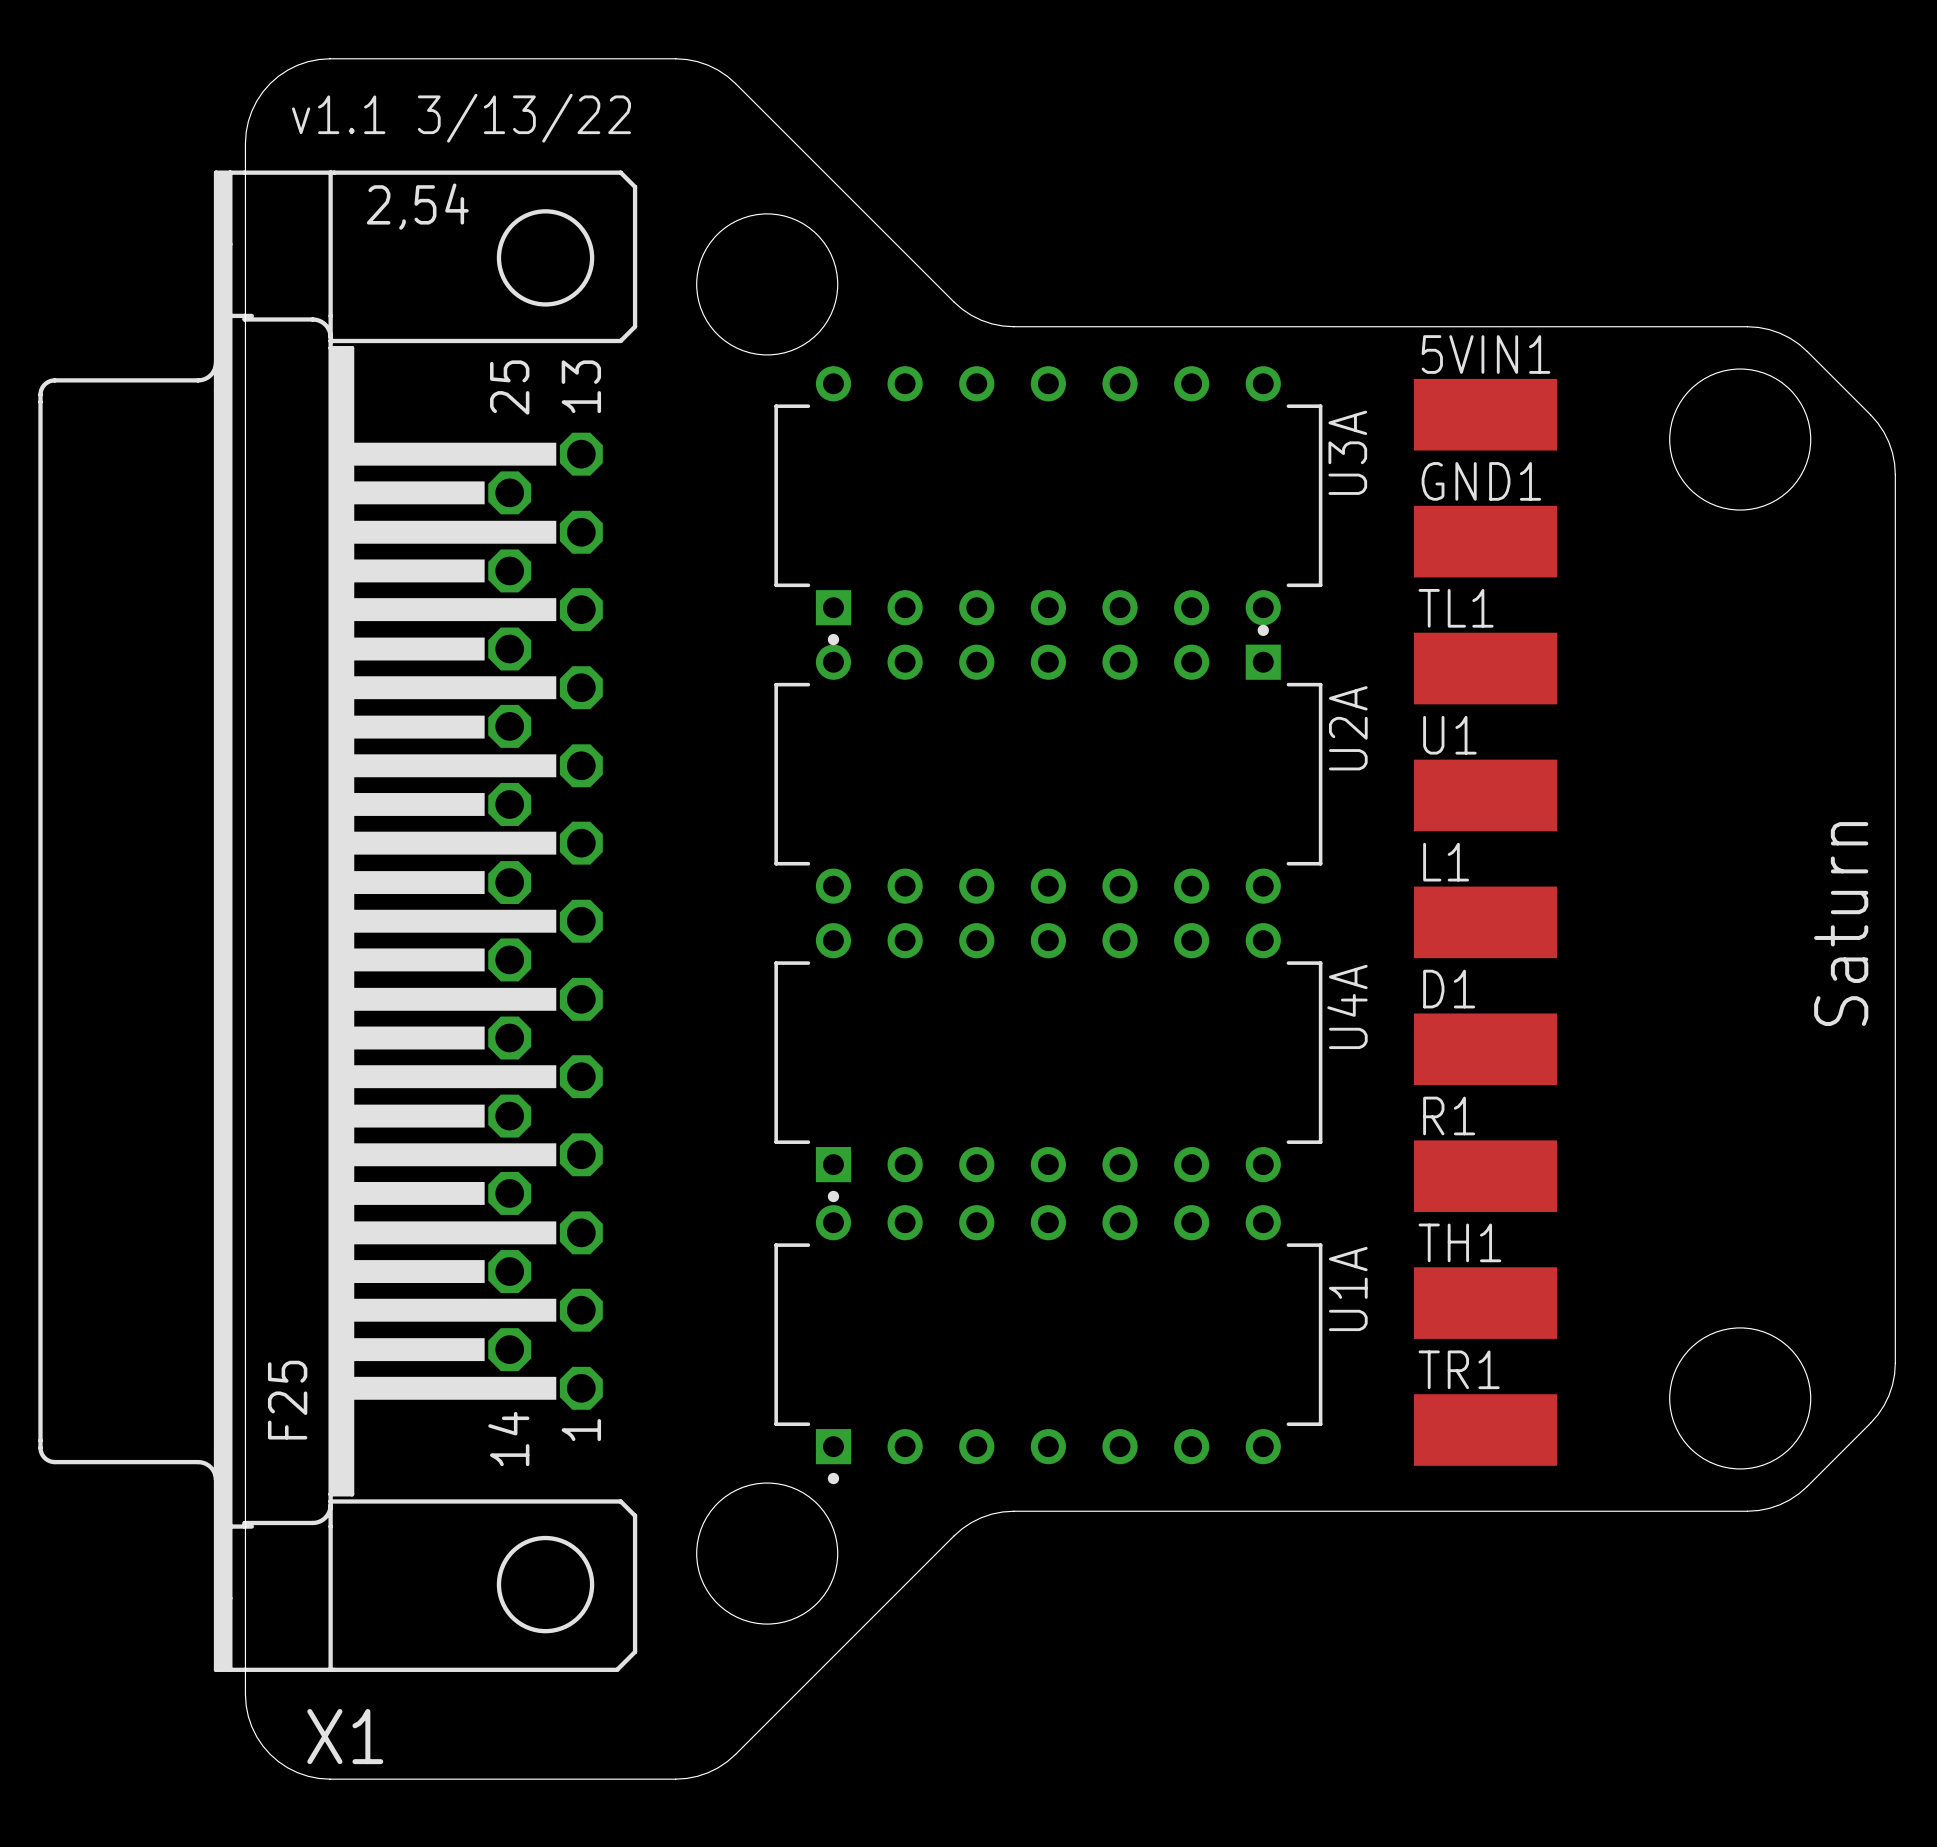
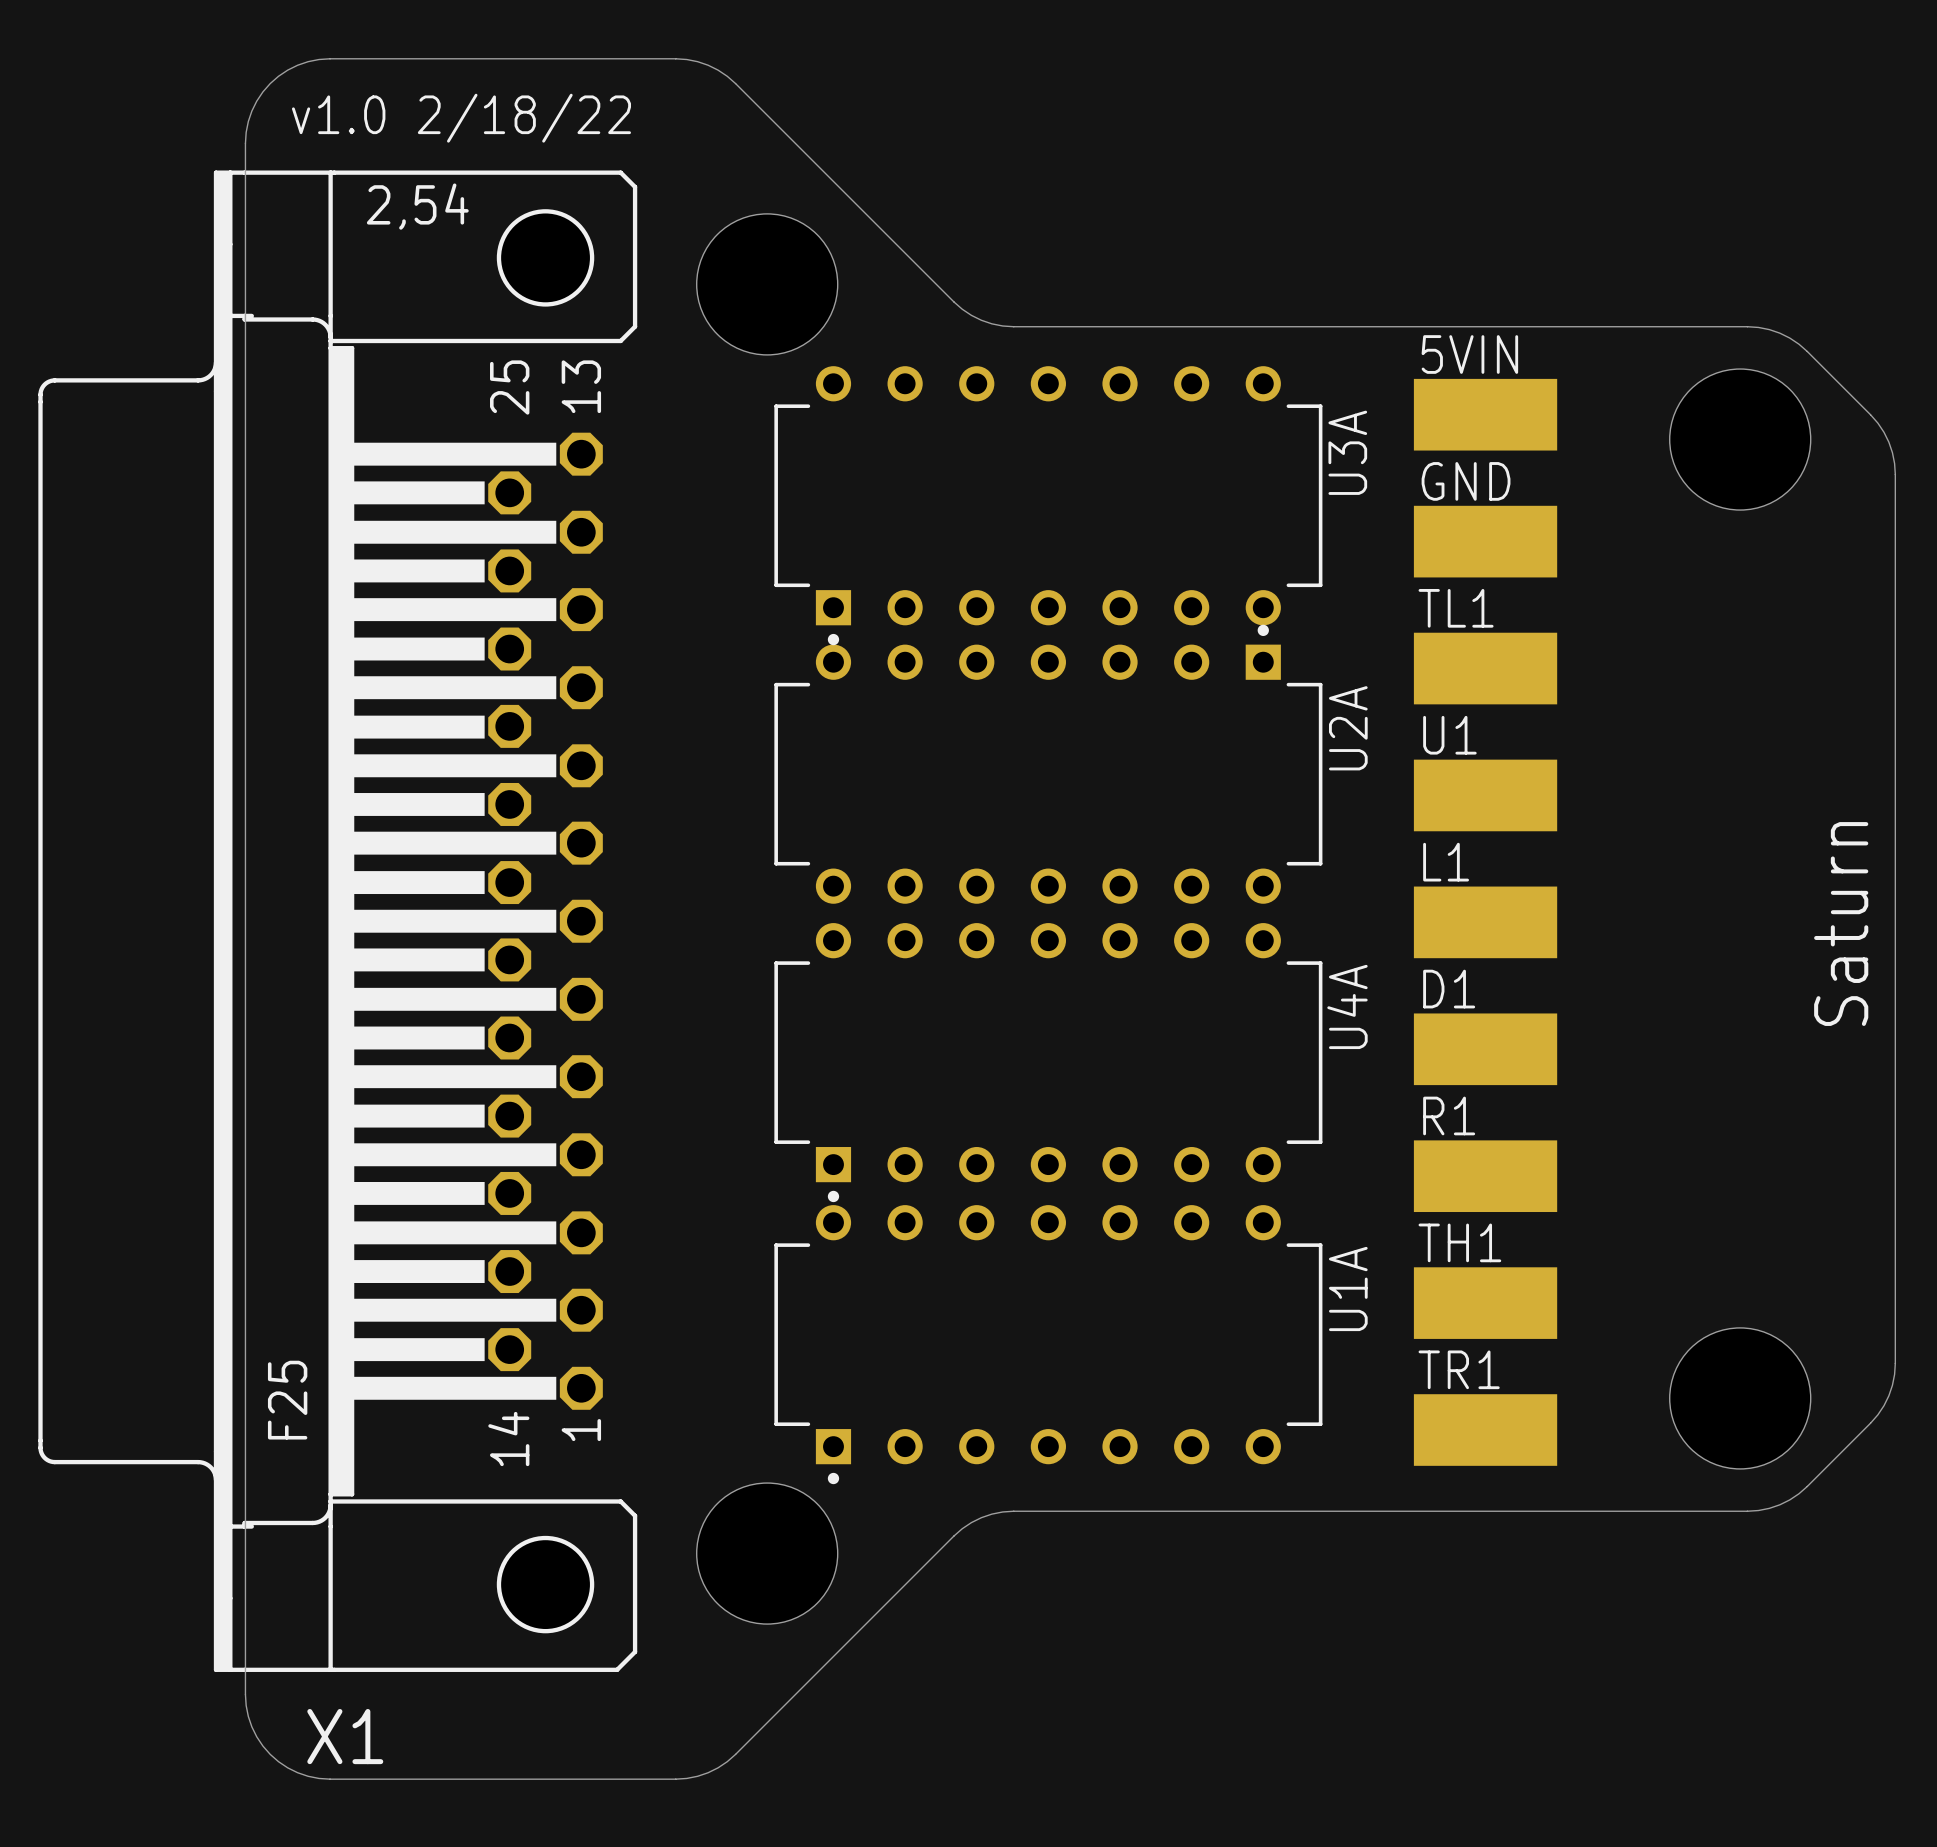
text: v1.1 3/13/22 (461, 118) -> v1.0 2/18/22 (461, 118)
5VIN1 name: 5VIN1 (1485, 354) -> 5VIN (1469, 354)
GND1 name: GND1 (1481, 481) -> GND (1466, 481)

